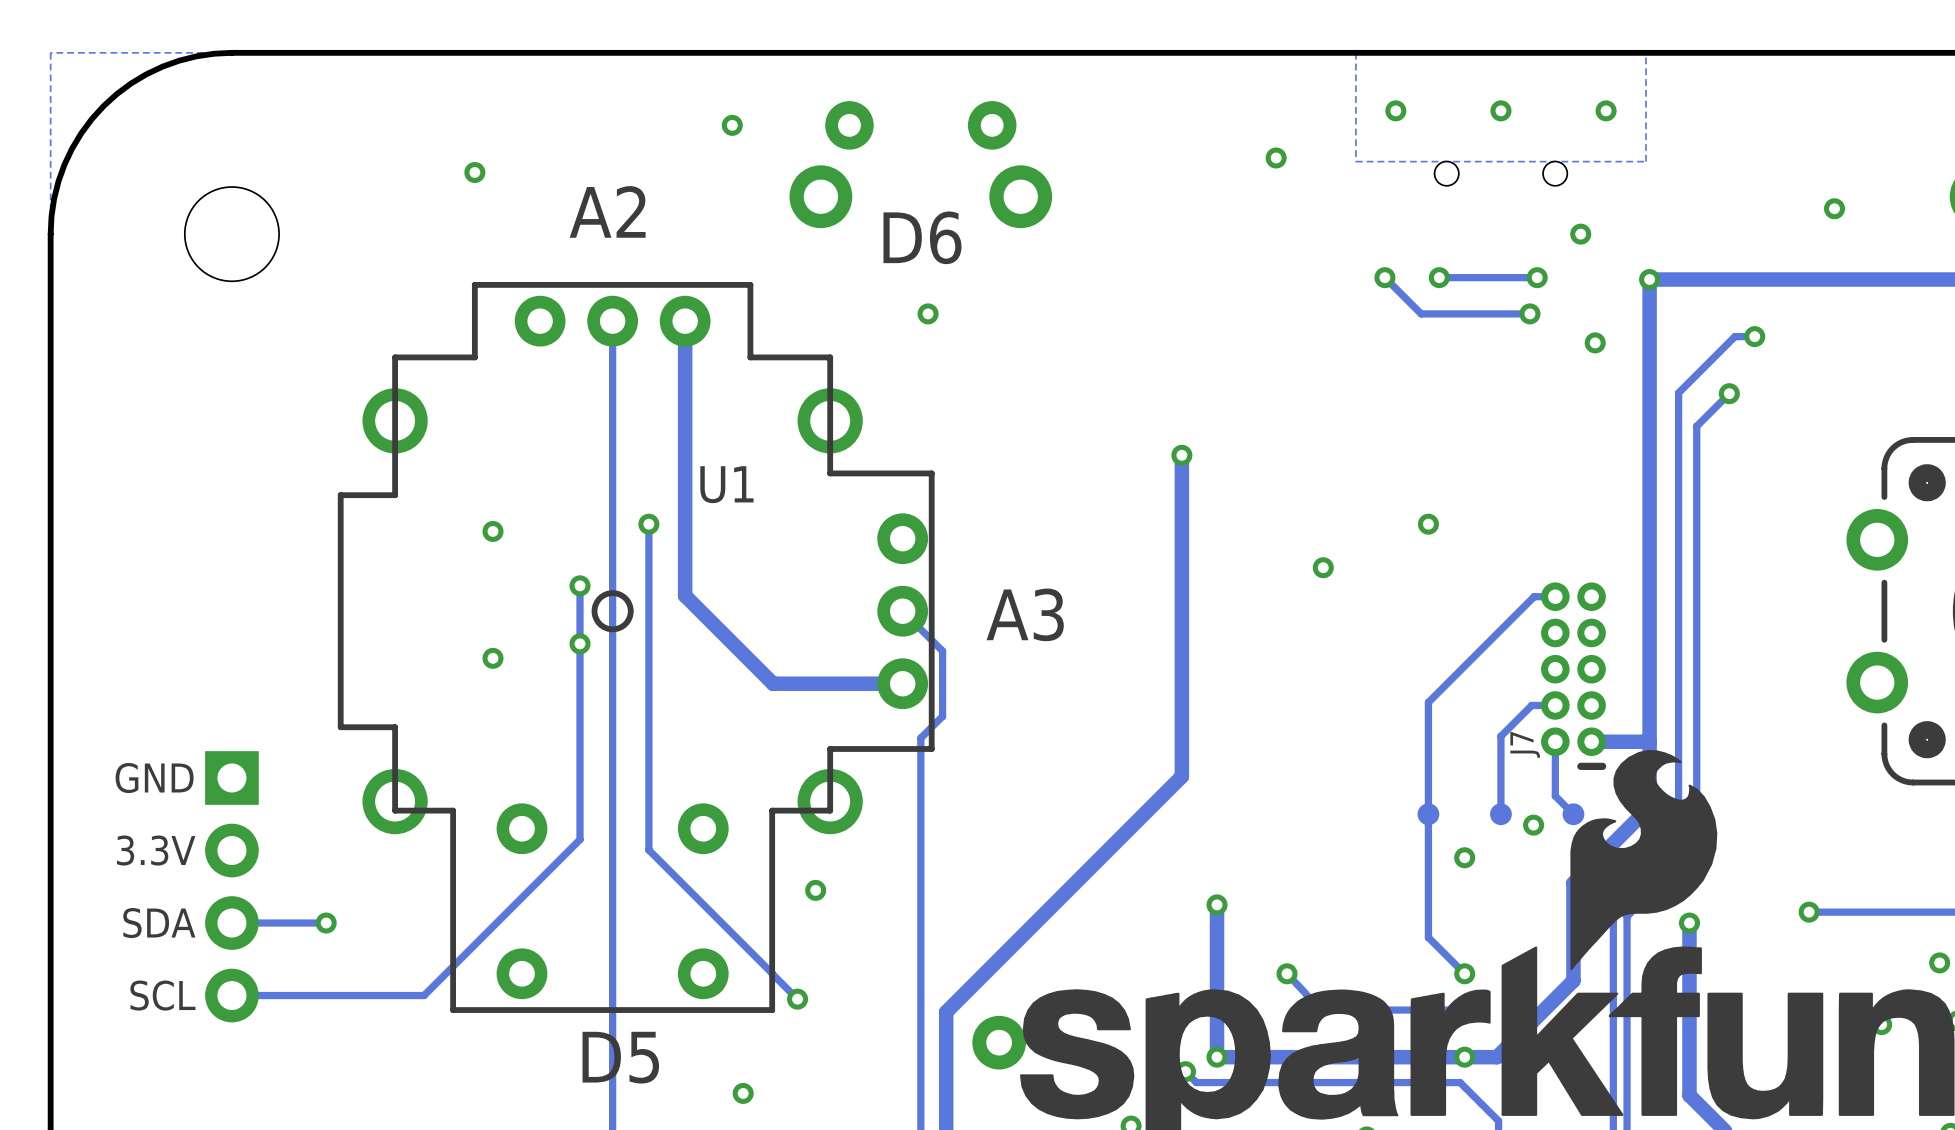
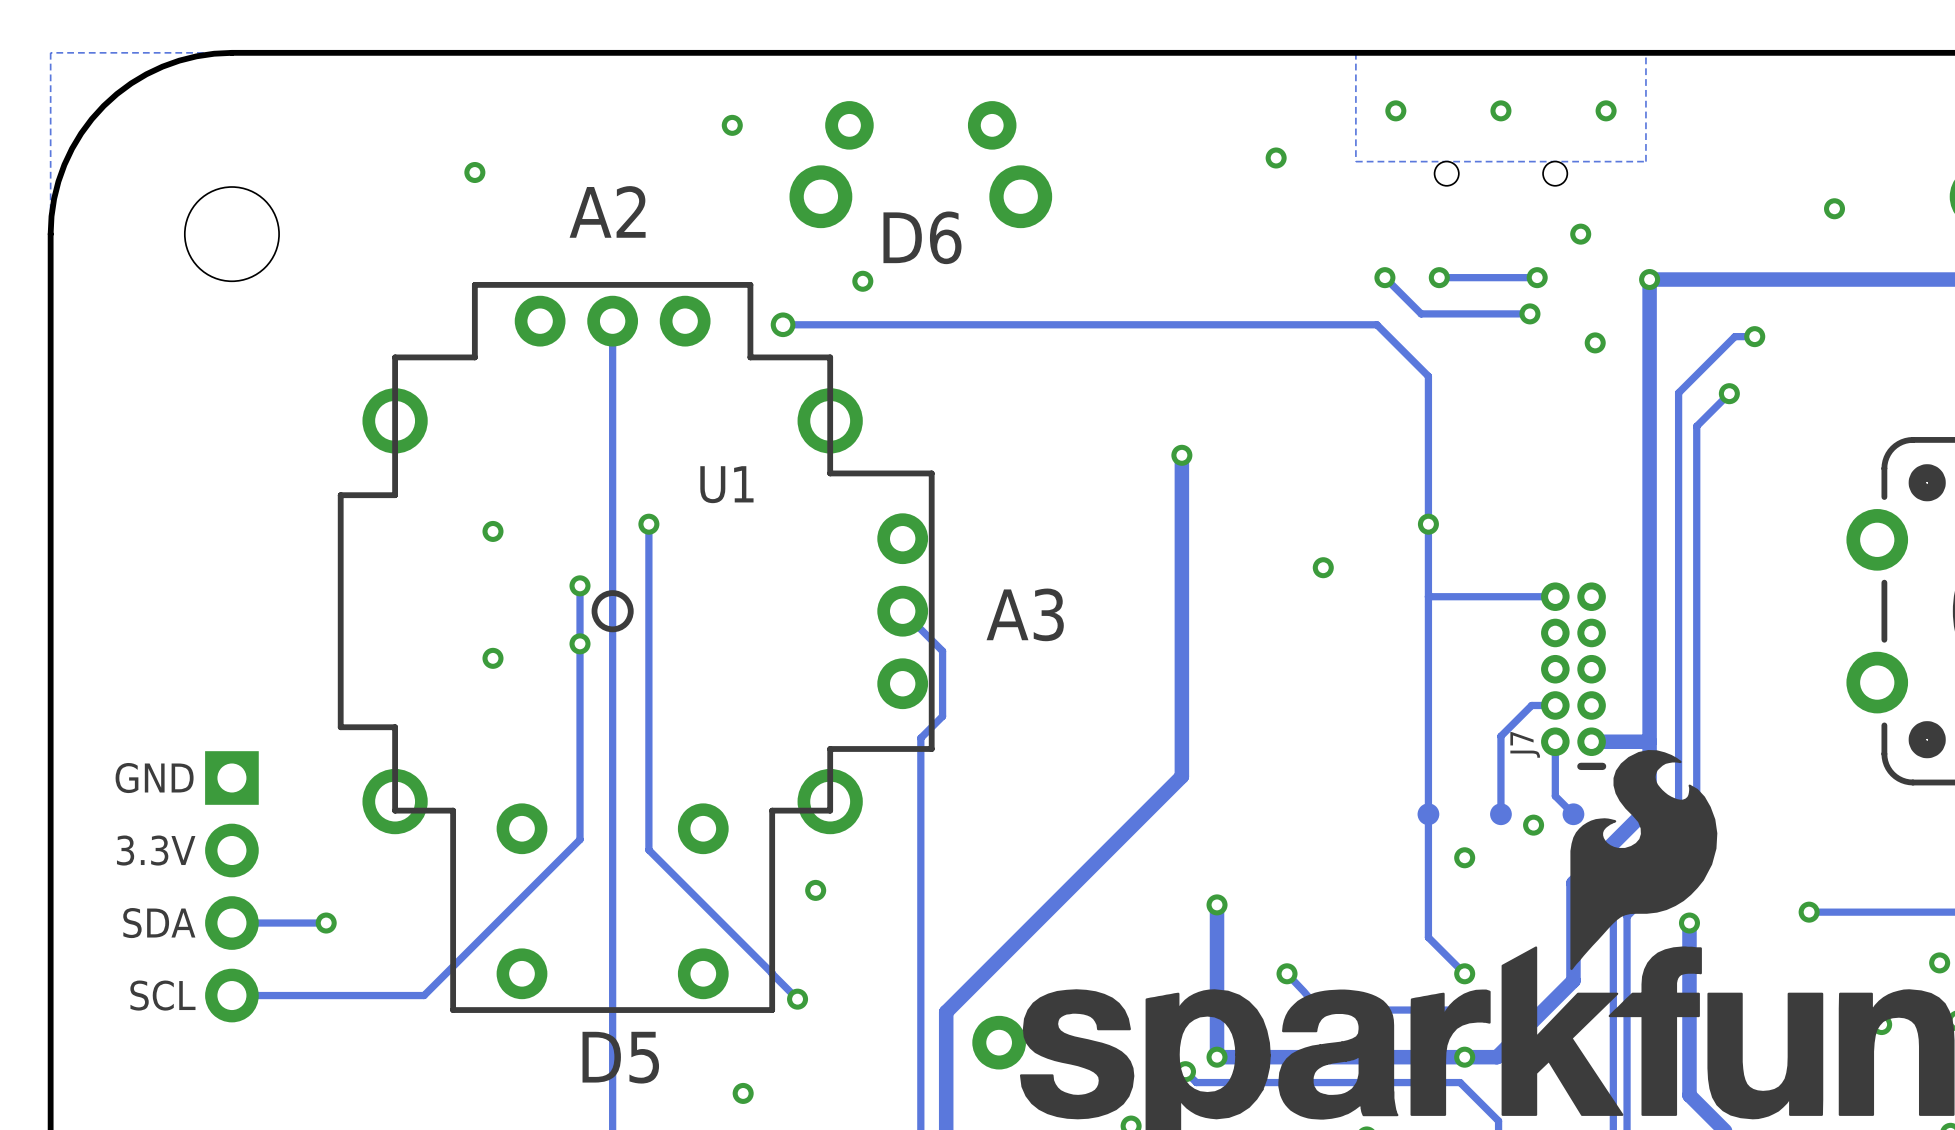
via position: (928, 313) -> (862, 281)
track: (685, 321) (685, 595) (773, 683) (902, 683) -> none
track: none -> (783, 324) (1376, 324) (1428, 376) (1428, 702)
via: none -> (783, 324)
track: (1534, 596) (1428, 702) -> (1534, 596) (1428, 596)

